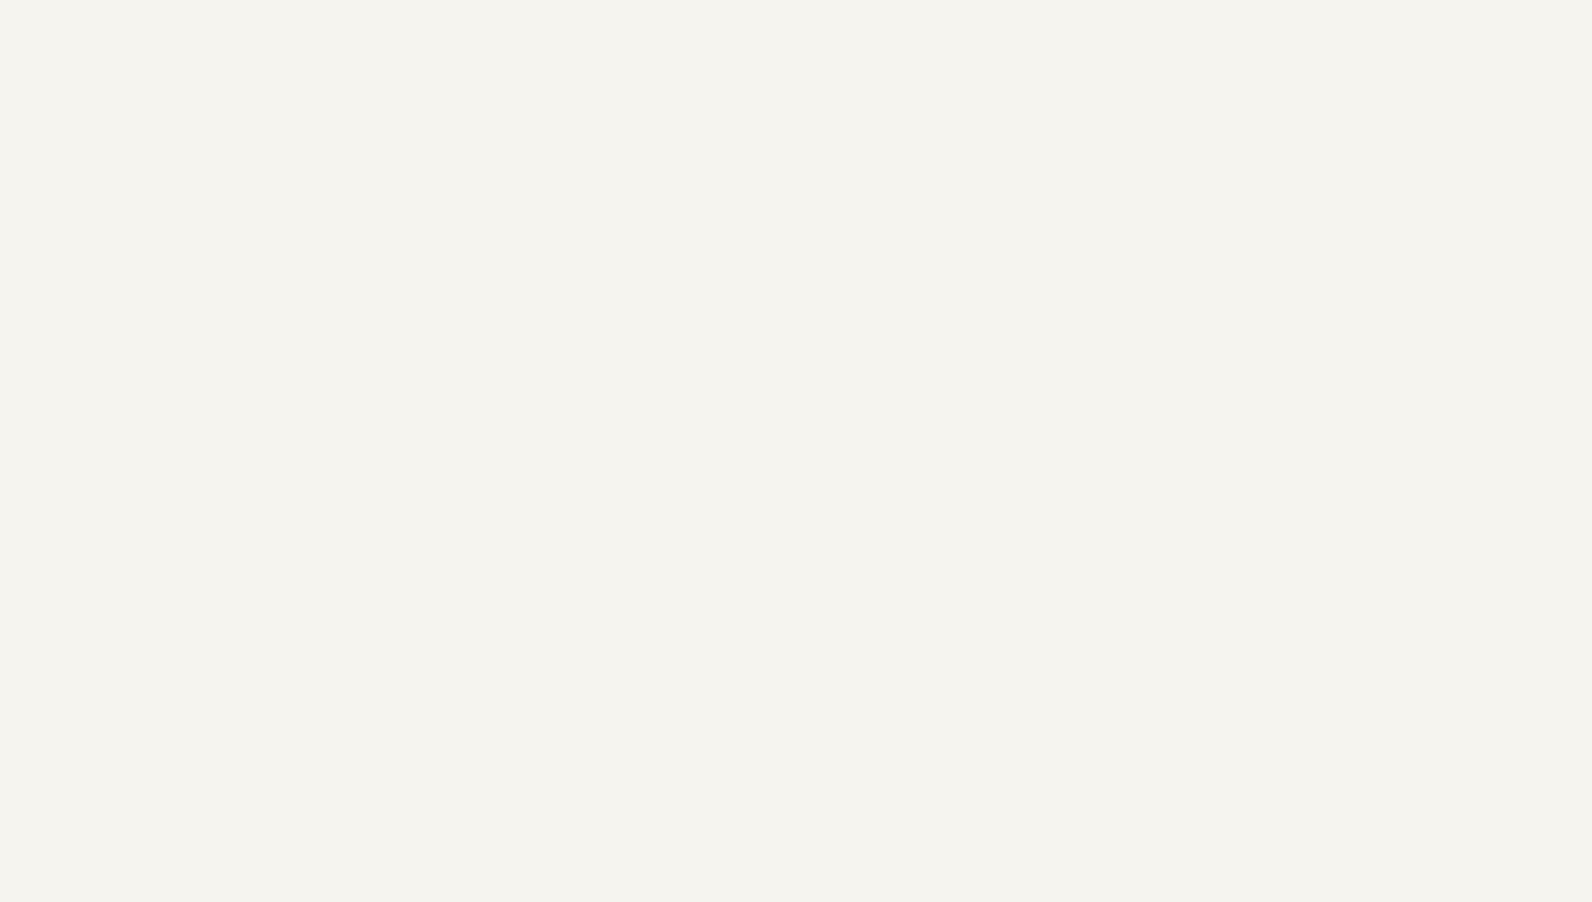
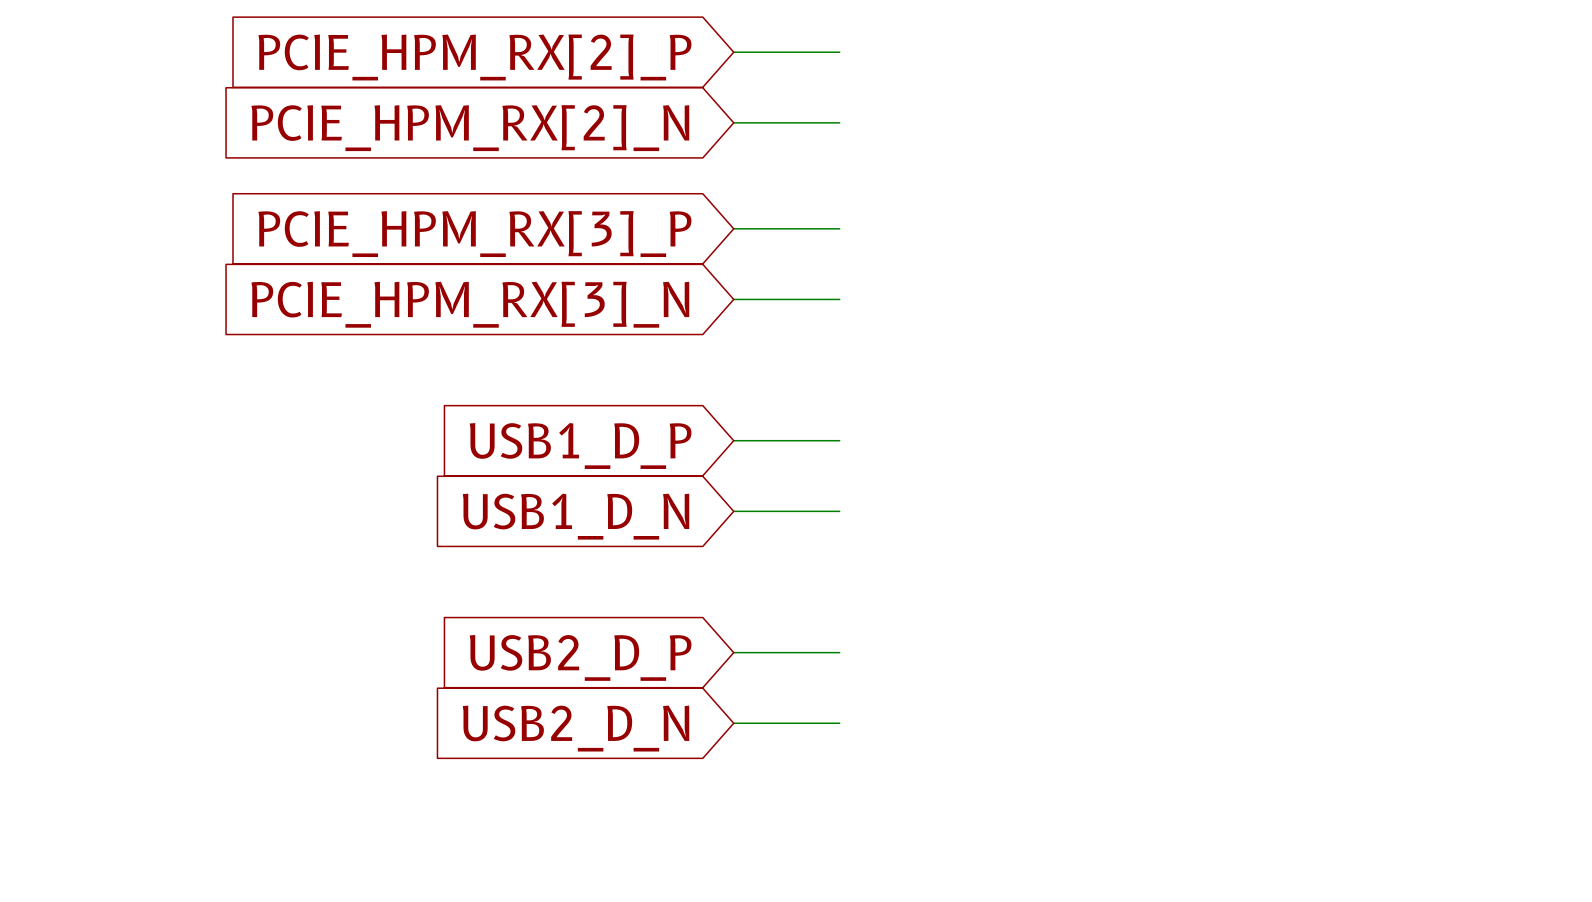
wire: none -> (733, 52) (839, 52)
global label: none -> PCIE_HPM_RX[2]_P (474, 57)
wire: none -> (733, 122) (839, 122)
global label: none -> PCIE_HPM_RX[2]_N (470, 128)
wire: none -> (733, 228) (839, 228)
global label: none -> PCIE_HPM_RX[3]_P (474, 234)
wire: none -> (733, 299) (839, 299)
global label: none -> PCIE_HPM_RX[3]_N (470, 304)
wire: none -> (733, 440) (839, 440)
global label: none -> USB1_D_P (580, 446)
wire: none -> (733, 511) (839, 511)
global label: none -> USB1_D_N (576, 516)
wire: none -> (733, 652) (839, 652)
global label: none -> USB2_D_P (580, 657)
wire: none -> (733, 723) (839, 723)
global label: none -> USB2_D_N (576, 728)

